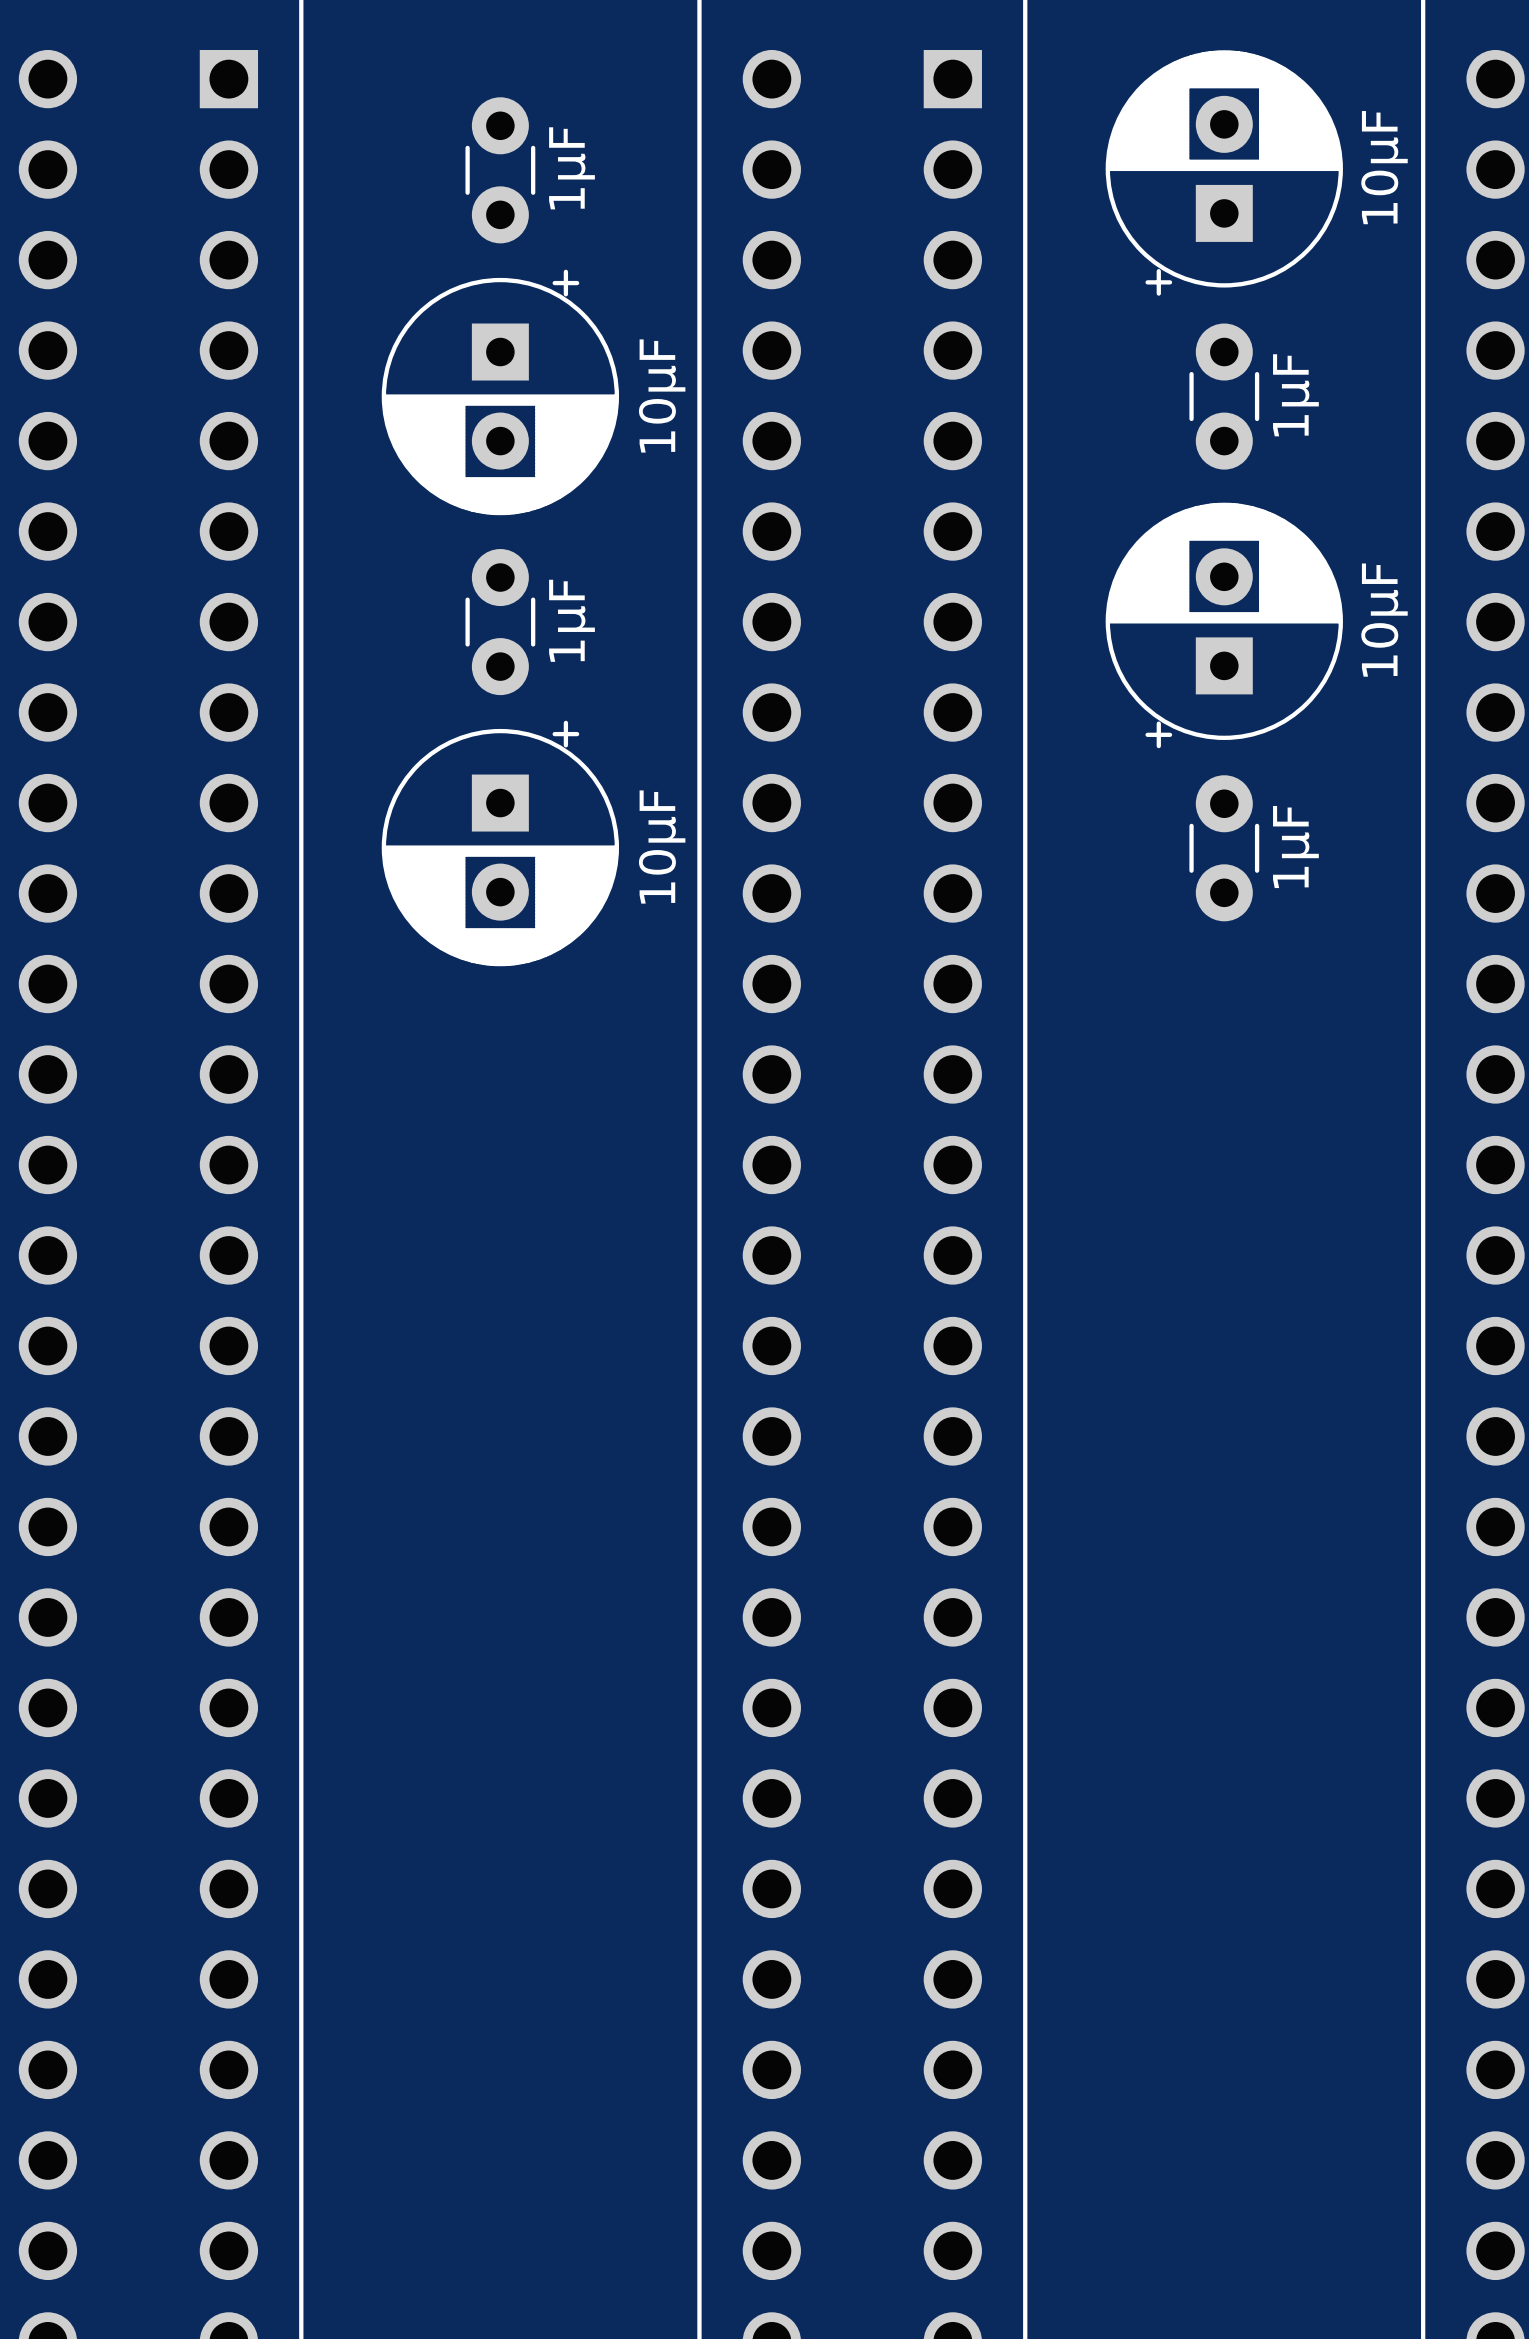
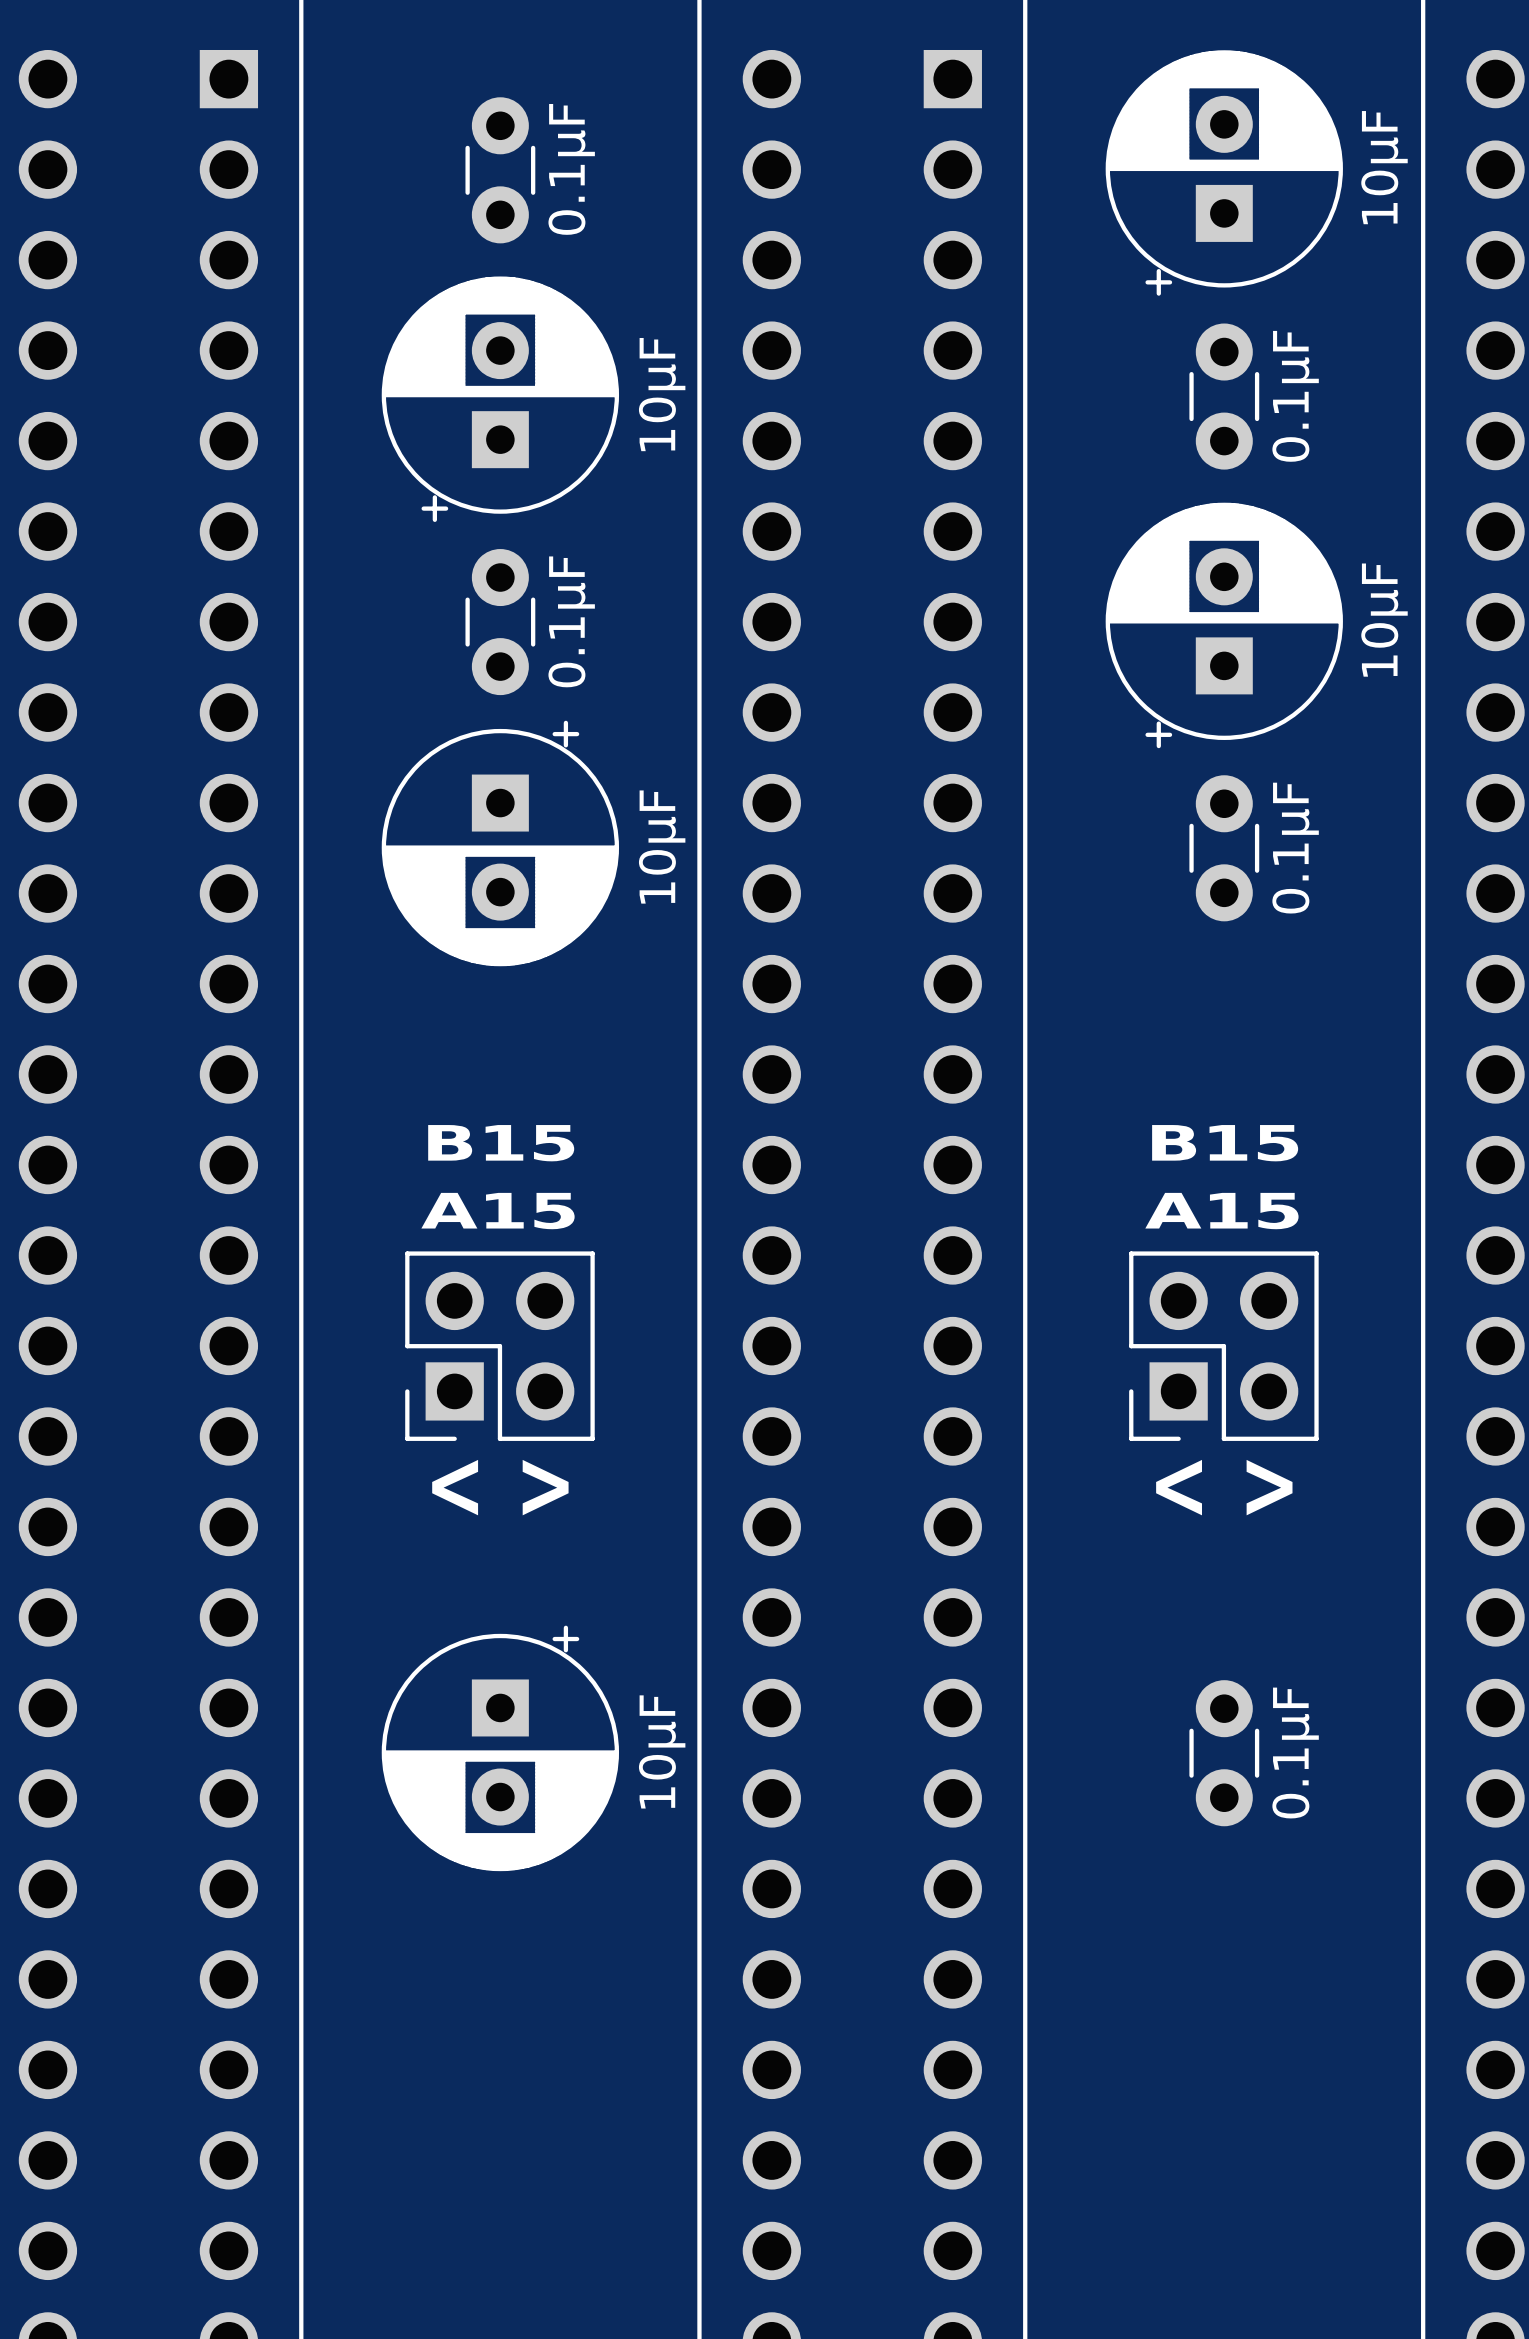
part value: 1µF (572, 168) -> 0.1µF (571, 169)
part rotation: 0° (500, 392) -> 180° (500, 399)
part value: 1µF (1295, 395) -> 0.1µF (1295, 396)
part value: 1µF (572, 620) -> 0.1µF (571, 621)
part value: 1µF (1295, 847) -> 0.1µF (1295, 848)
text: none -> B15 (501, 1143)
text: none -> B15 (1225, 1143)
text: none -> A15 (497, 1211)
text: none -> A15 (1221, 1211)
part: none -> (499, 1346)
part: none -> (1223, 1346)
text: none -> < (455, 1487)
text: none -> > (545, 1487)
text: none -> < (1179, 1487)
text: none -> > (1269, 1487)
part: none -> 10µF (500, 1748)
part: none -> 0.1µF (1224, 1753)

